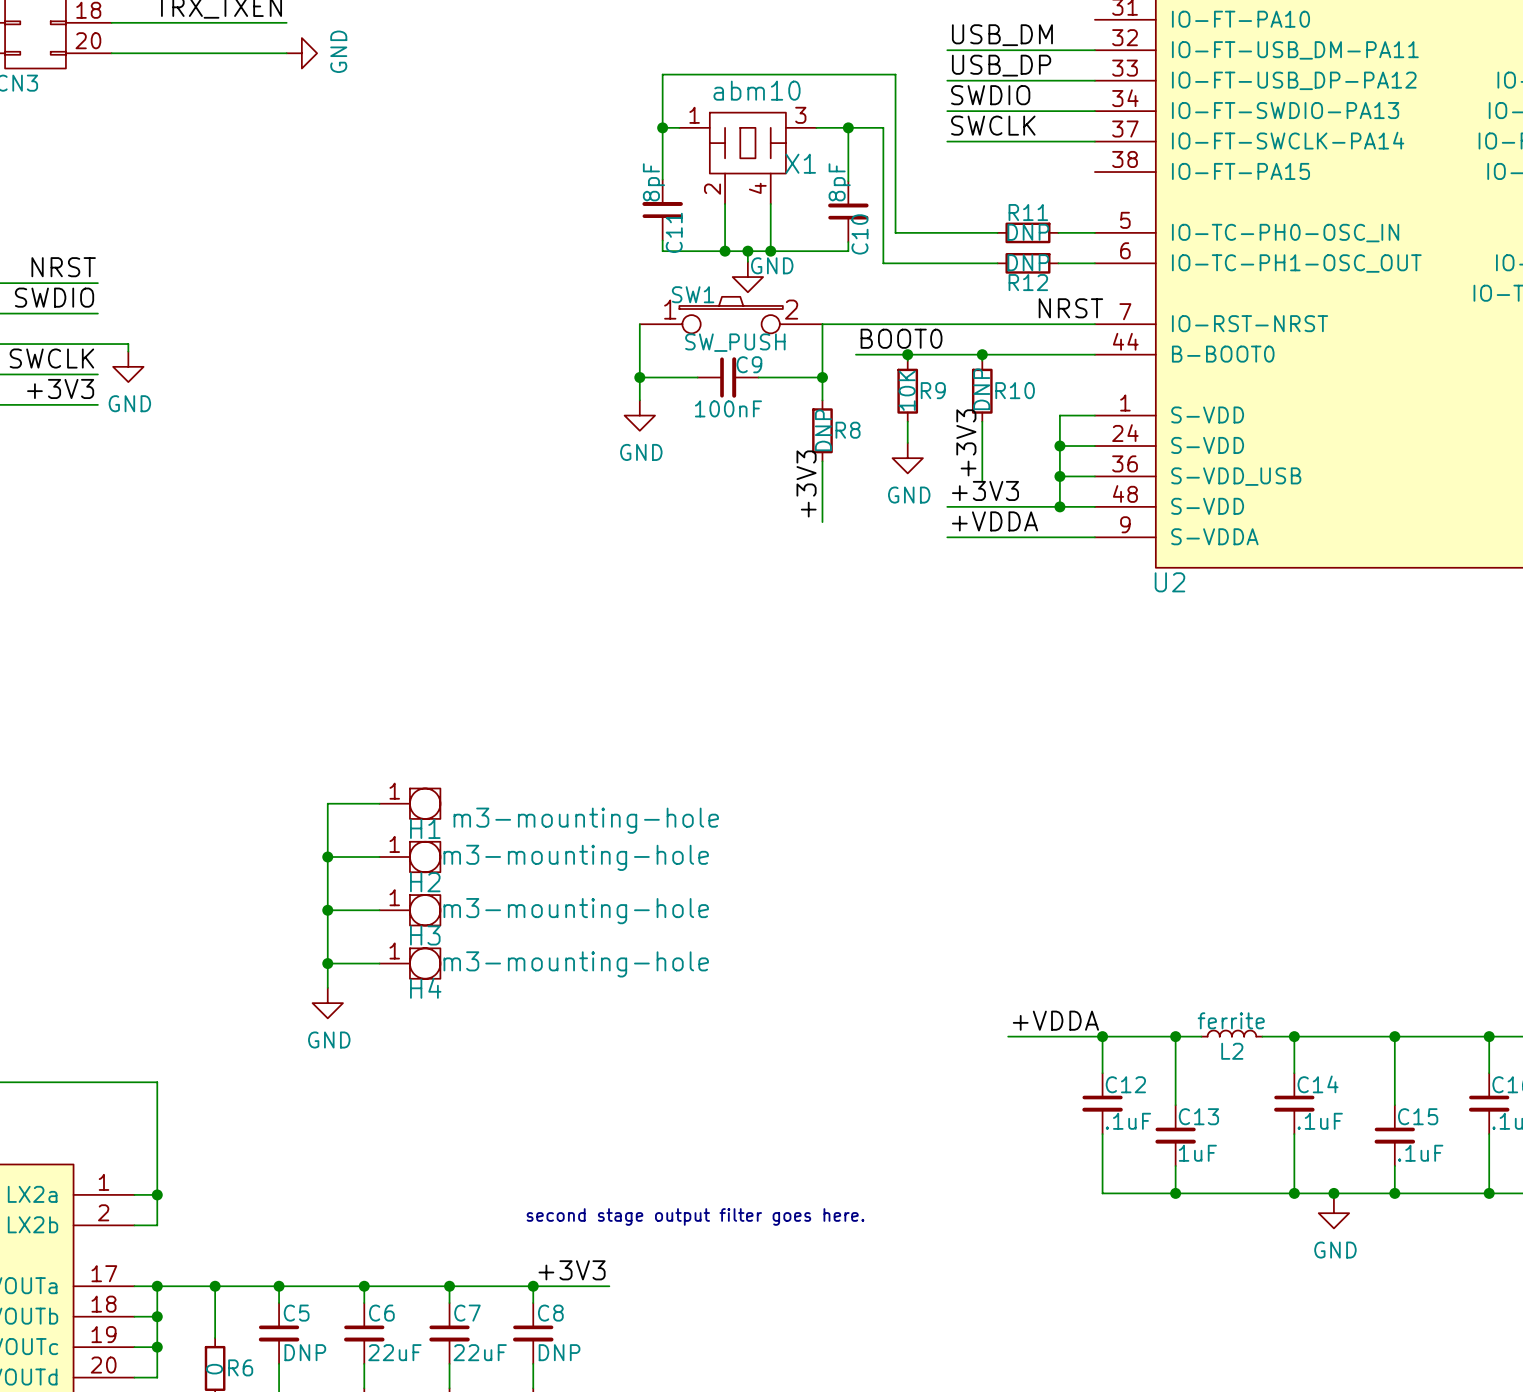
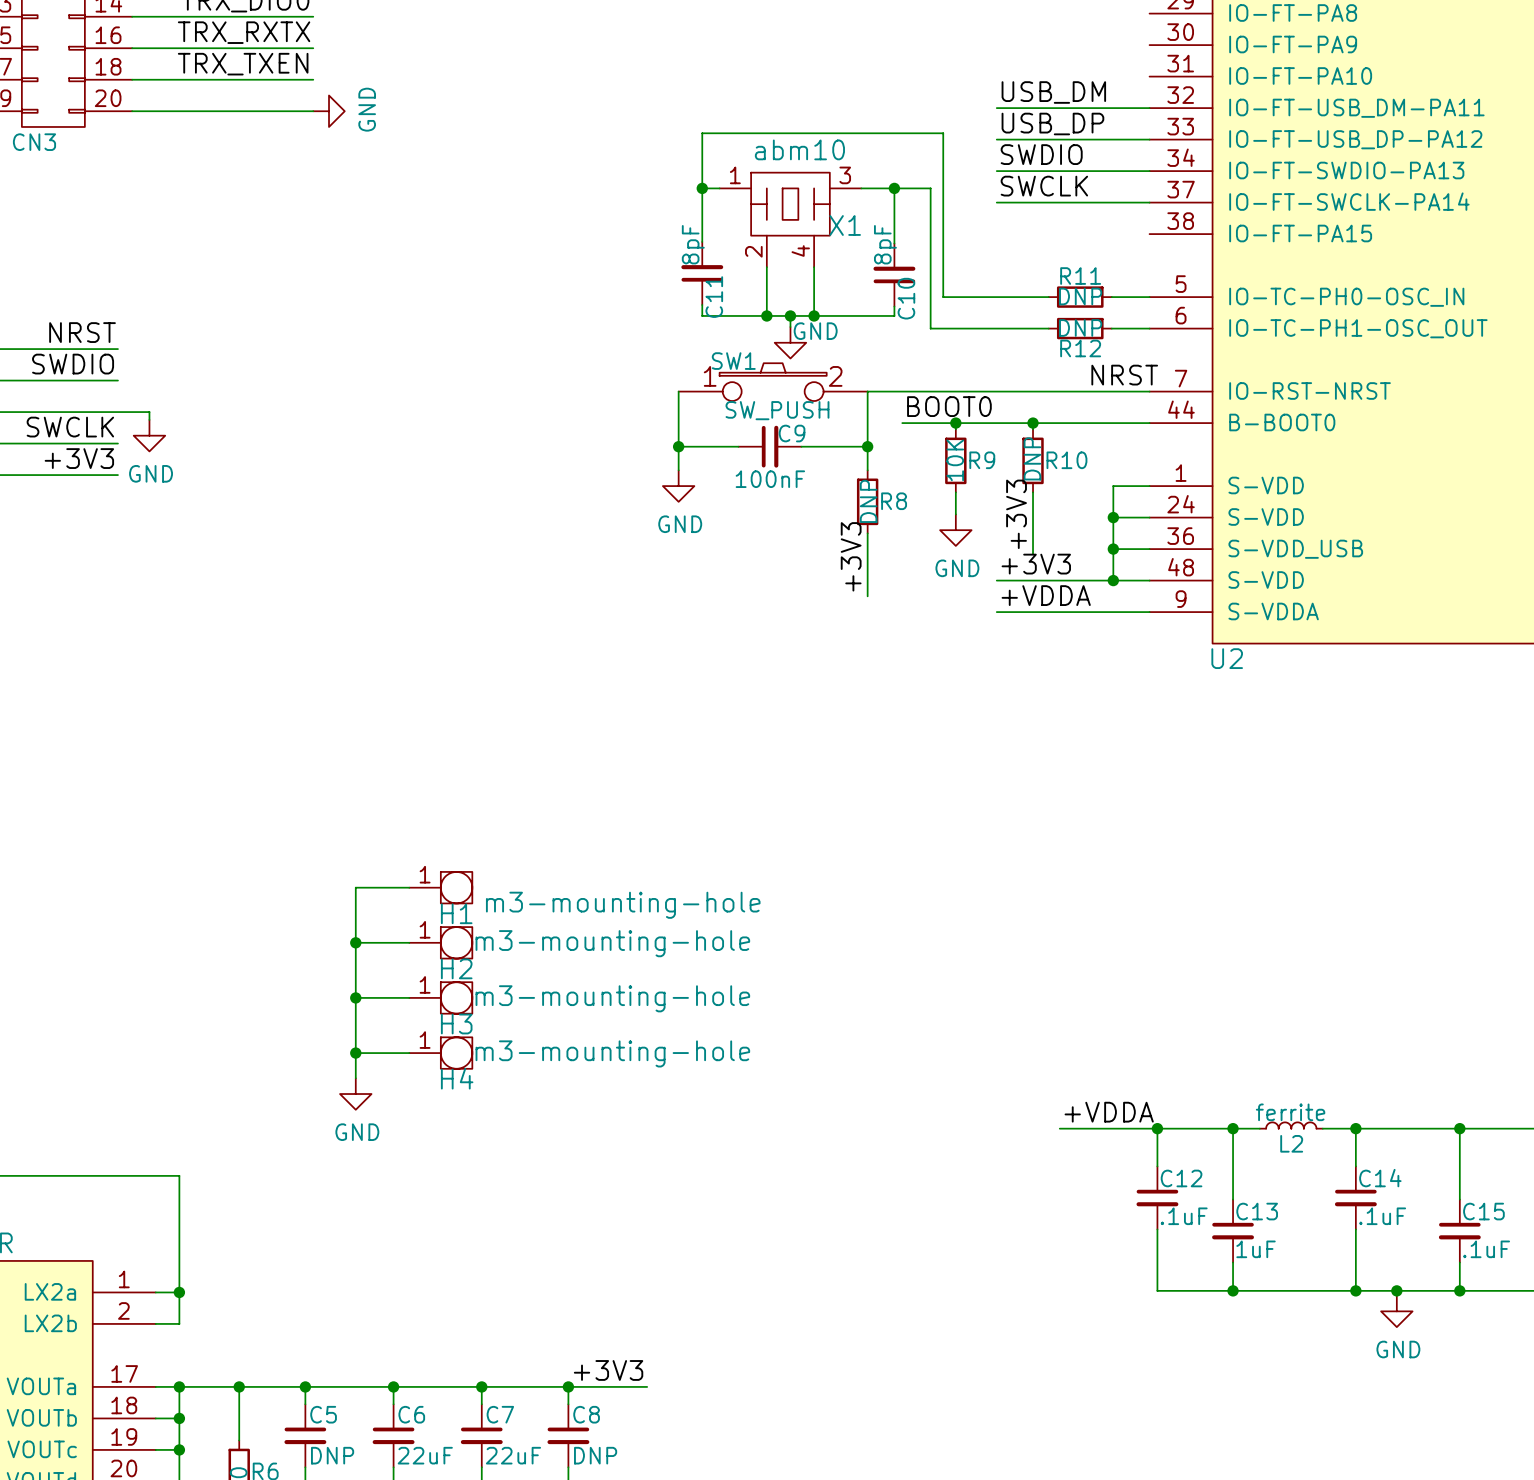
text: second stage output filter goes here. (695, 1216) -> none

